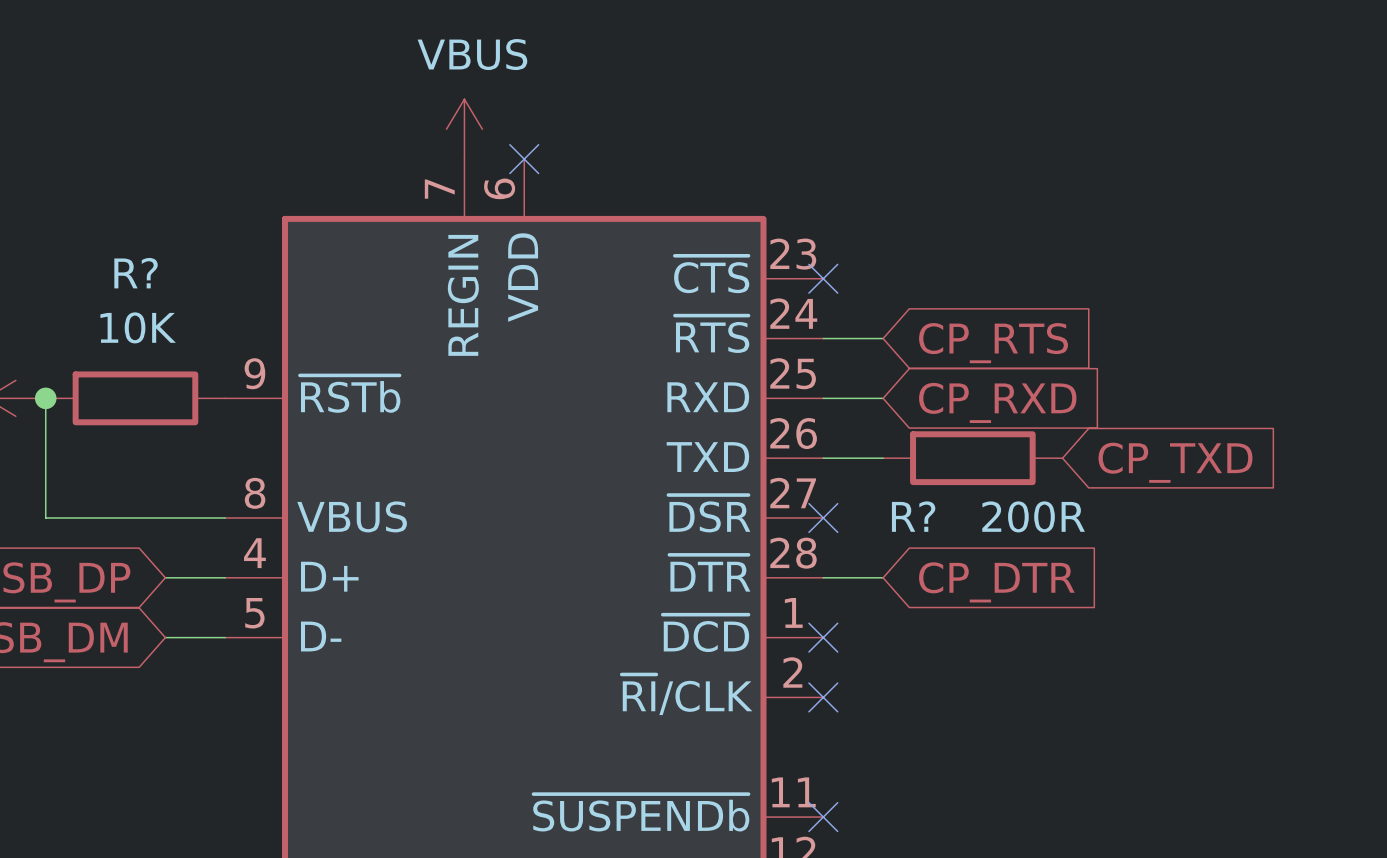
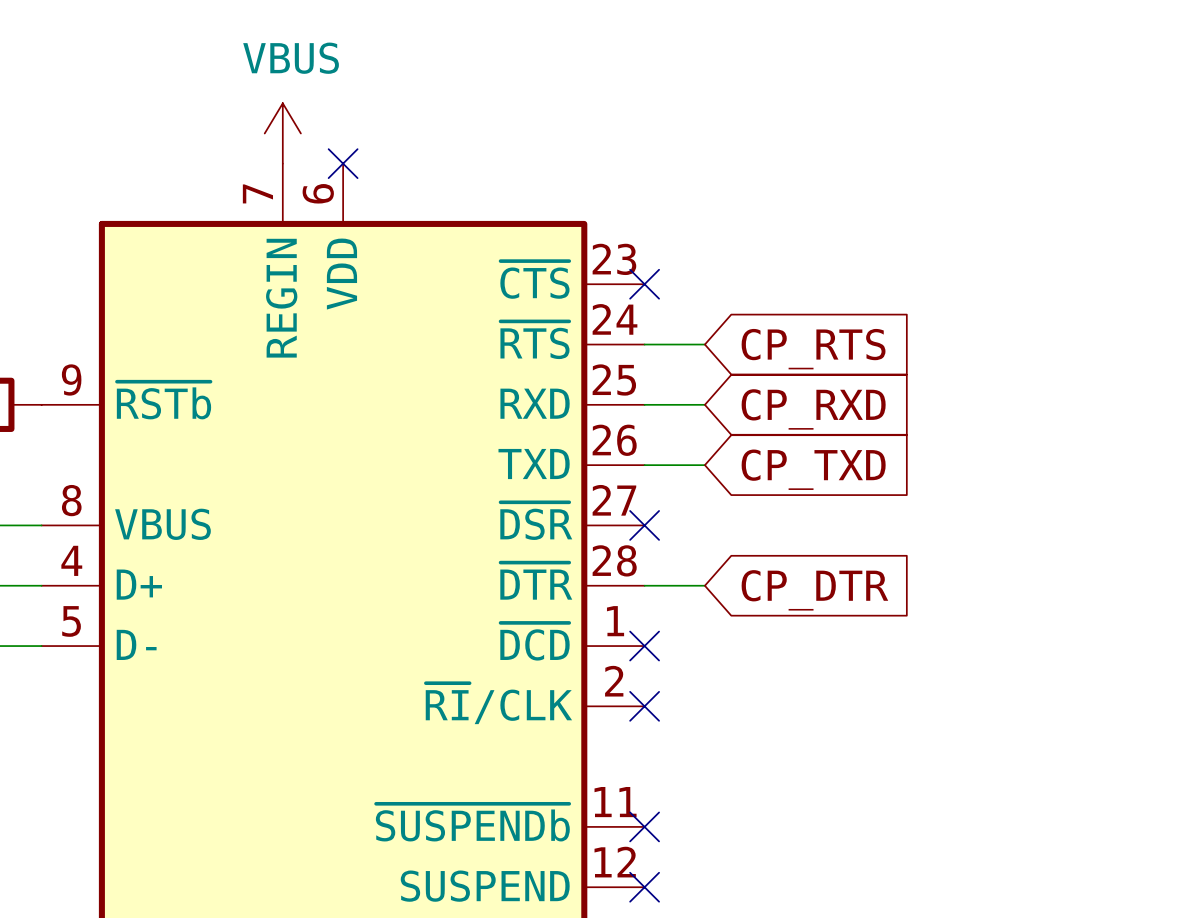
R?: 200R (972, 458) -> none
global label position: CP_TXD (1175, 462) -> CP_TXD (813, 469)

